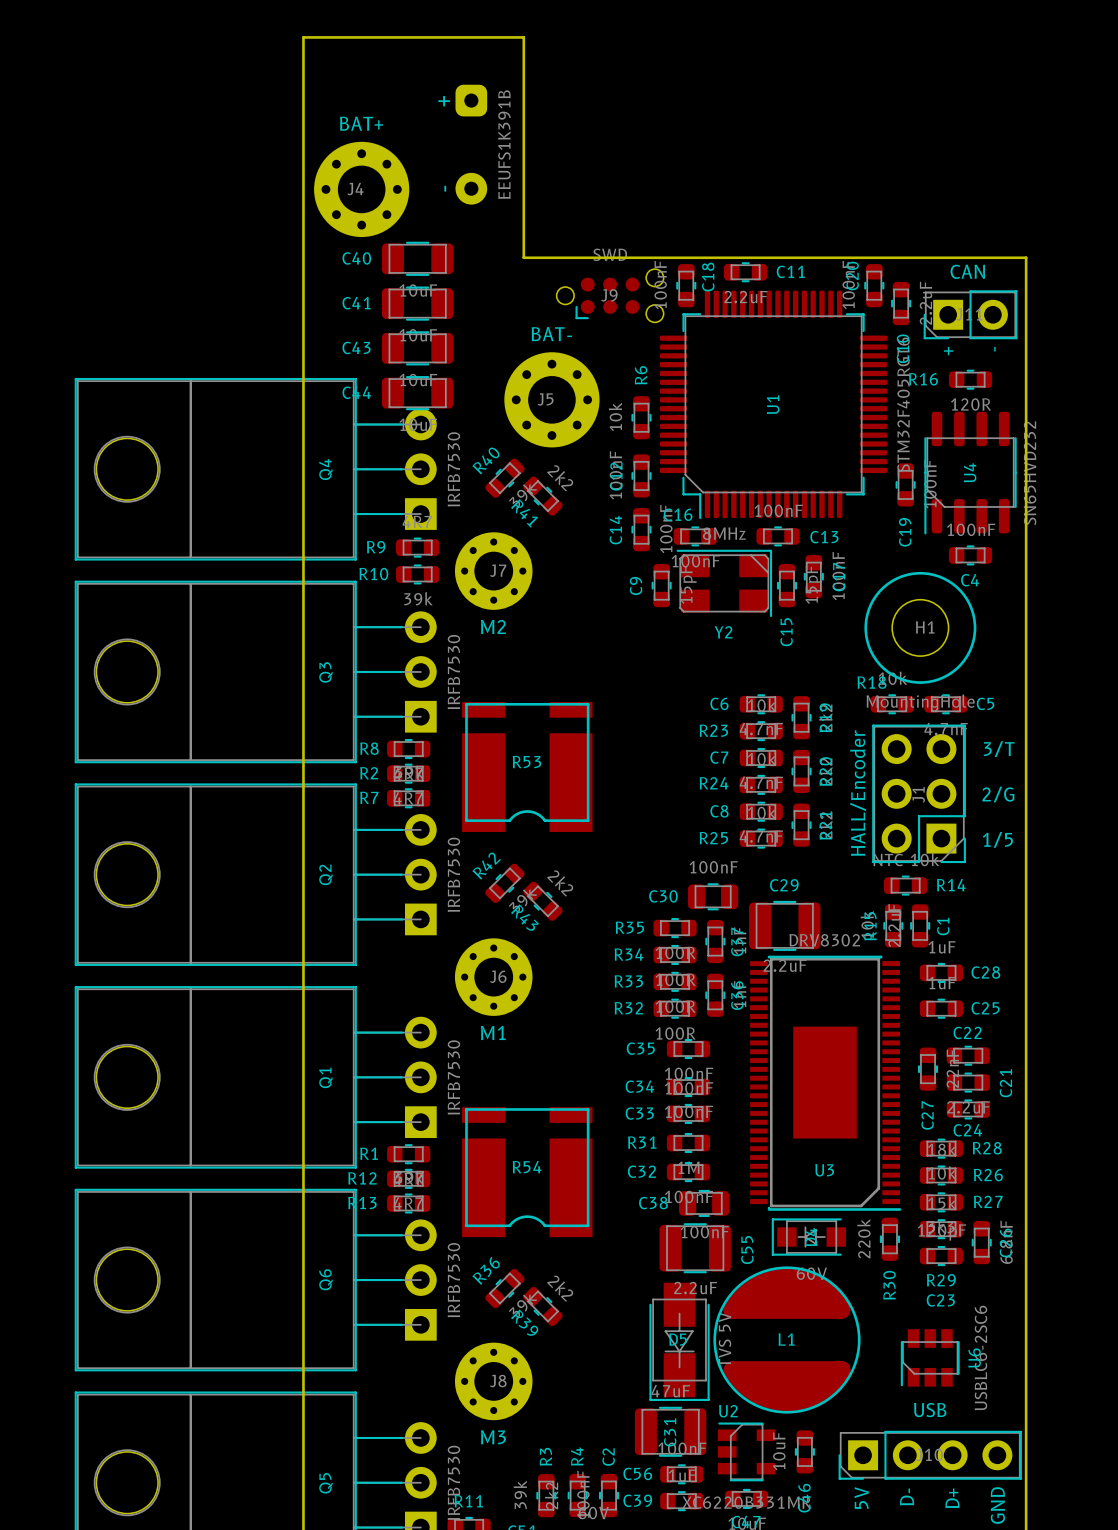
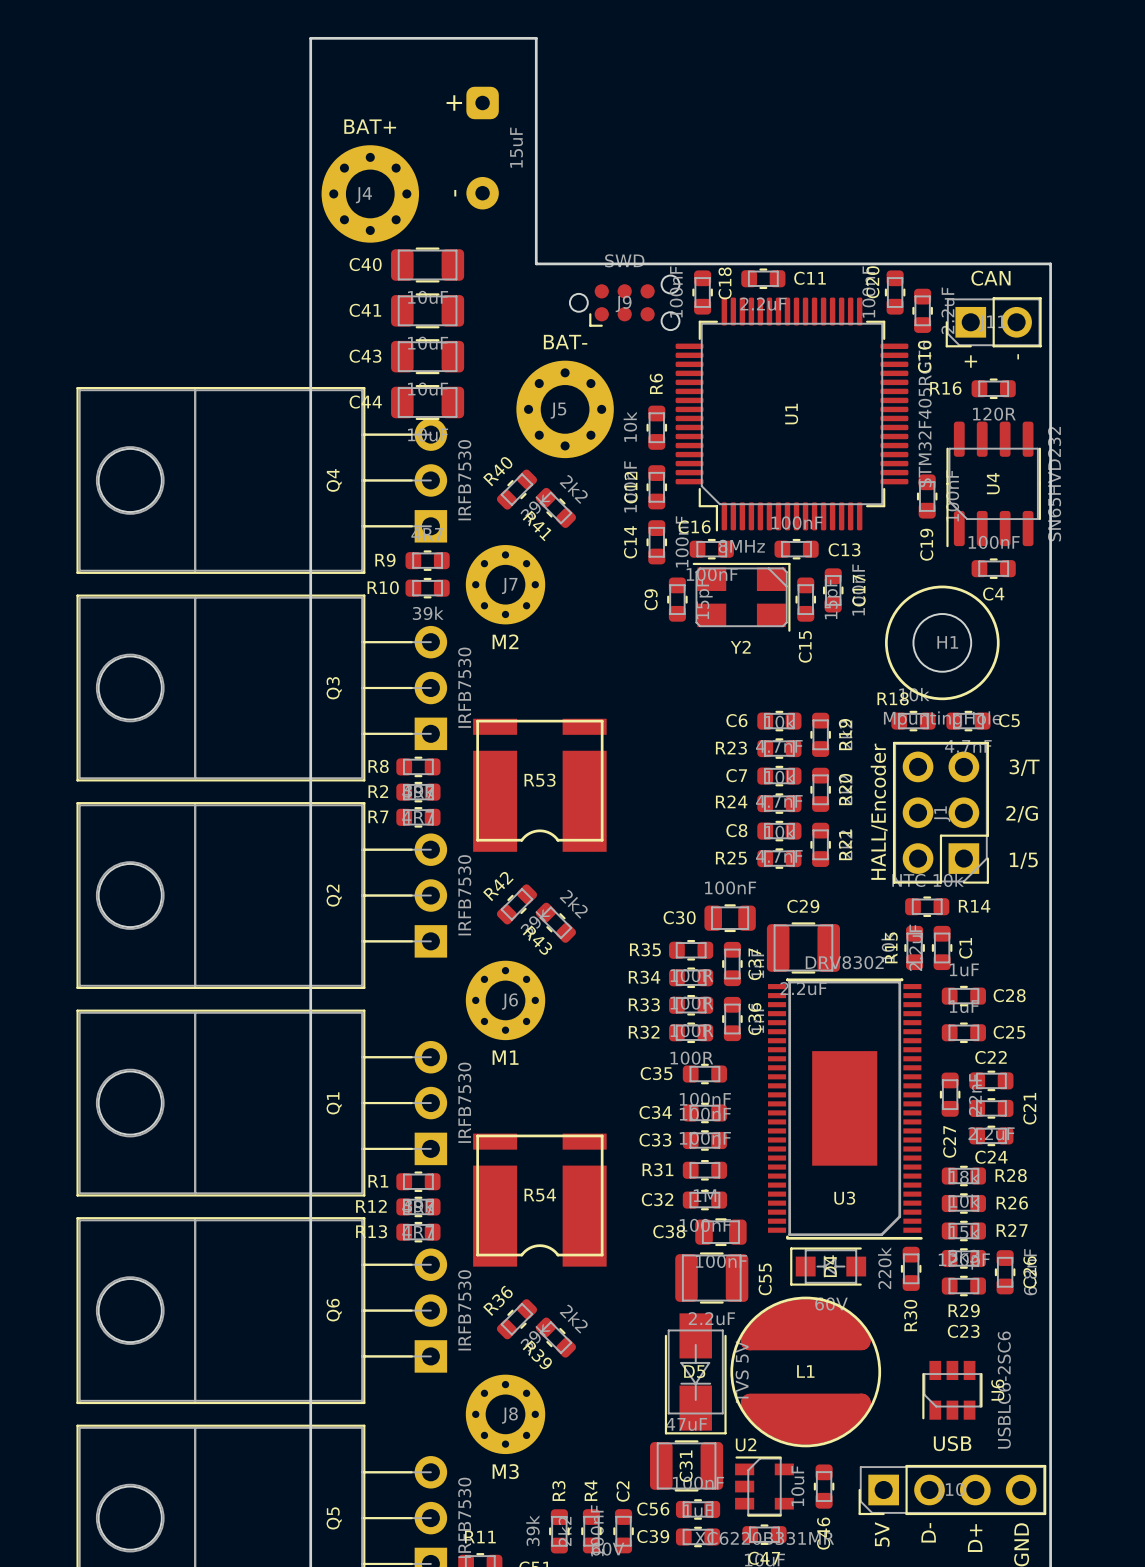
part value: EEUFS1K391B (504, 144) -> 15uF (516, 147)

